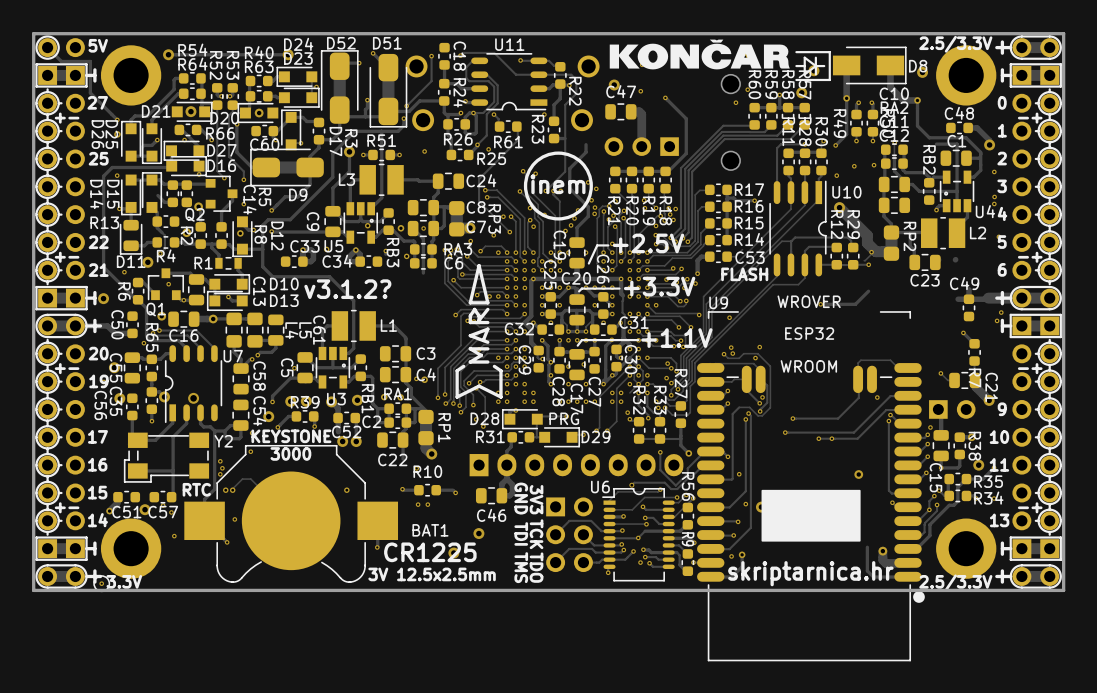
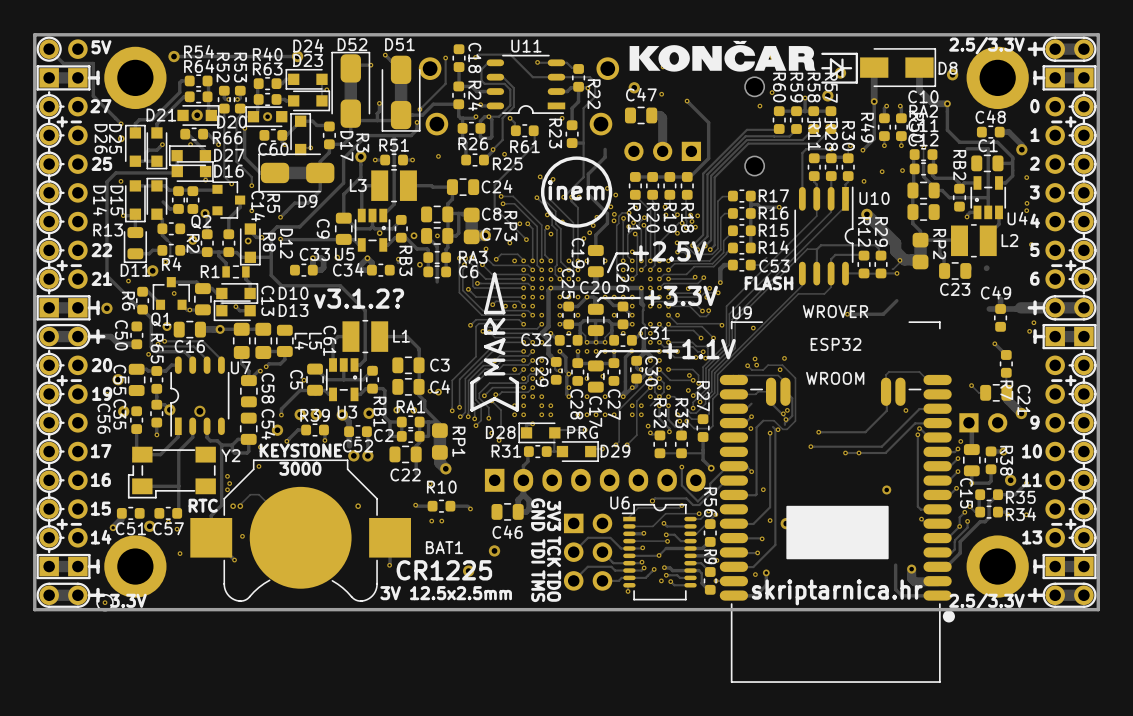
via: (727, 390) -> none
via: none -> (783, 413)
via: (759, 403) -> none
via: none -> (785, 419)
via: (760, 411) -> none
via: (748, 413) -> none
via: none -> (750, 428)
via: none -> (778, 429)

